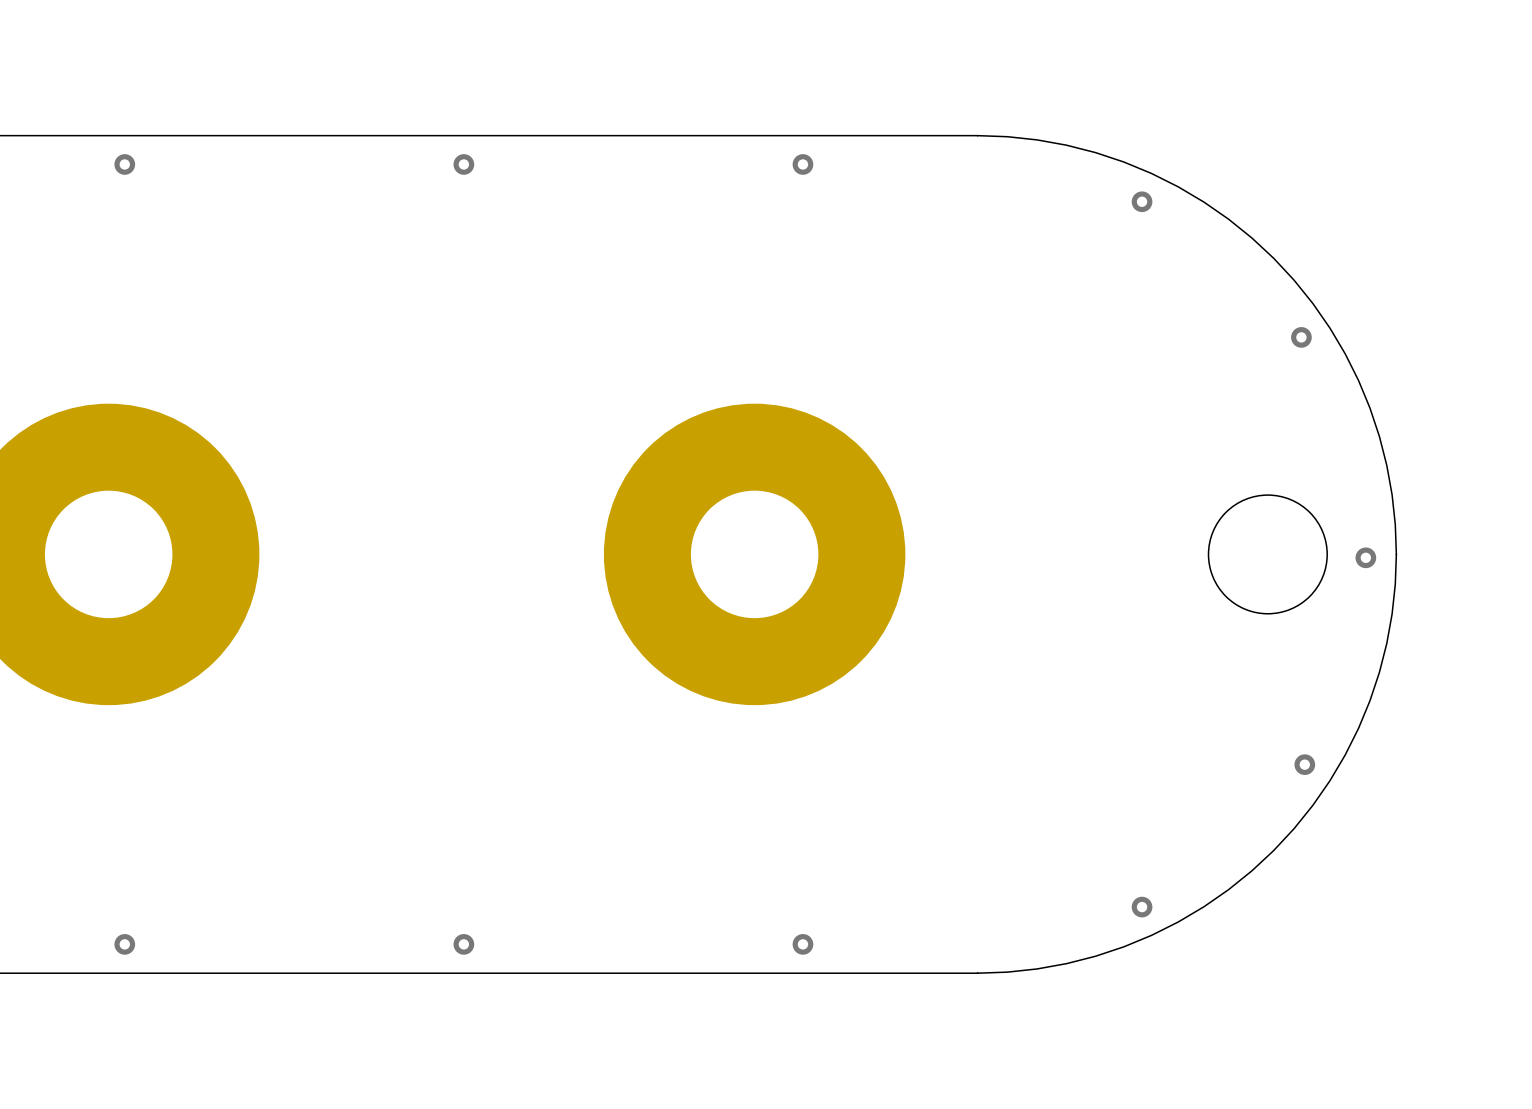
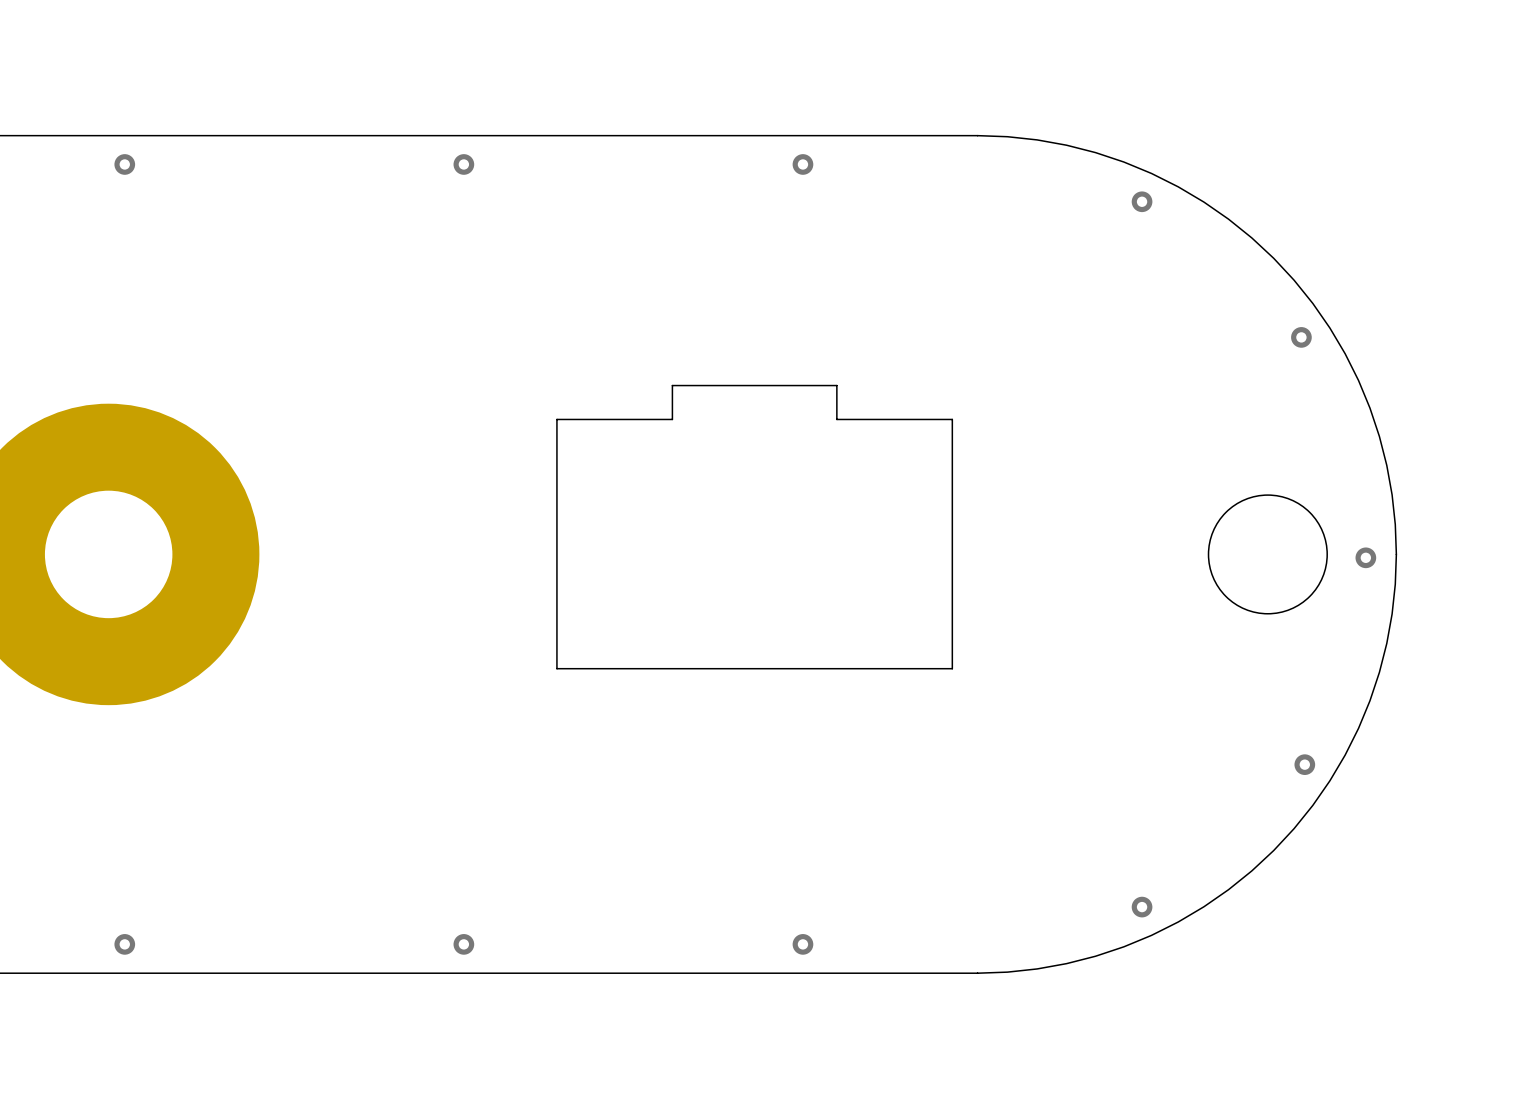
board edge: none -> (672, 385) (836, 385) (836, 419) (952, 419) (952, 668) (556, 668) (556, 419) (672, 419) (672, 385)
part: (754, 554) -> none

